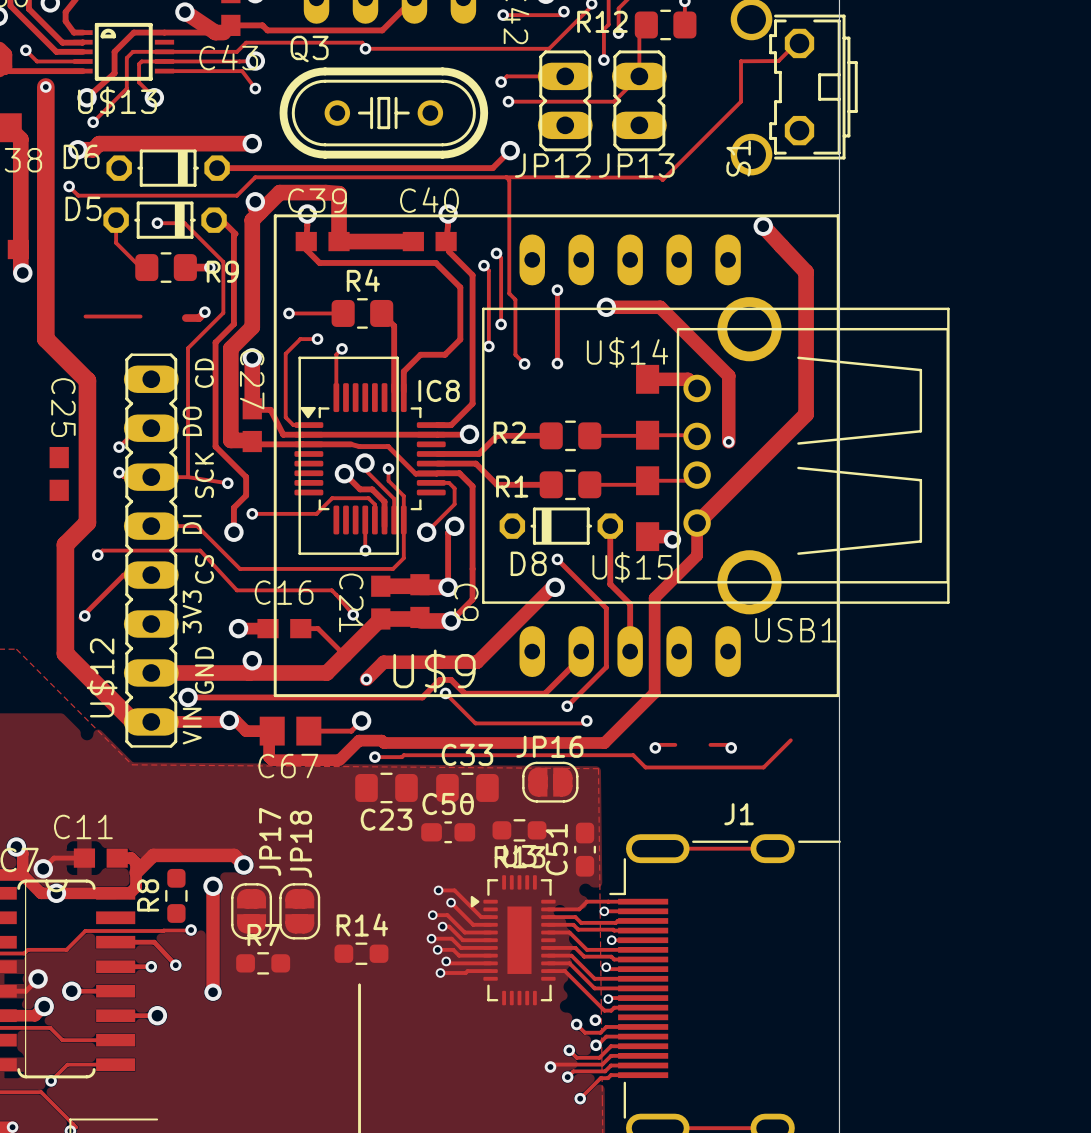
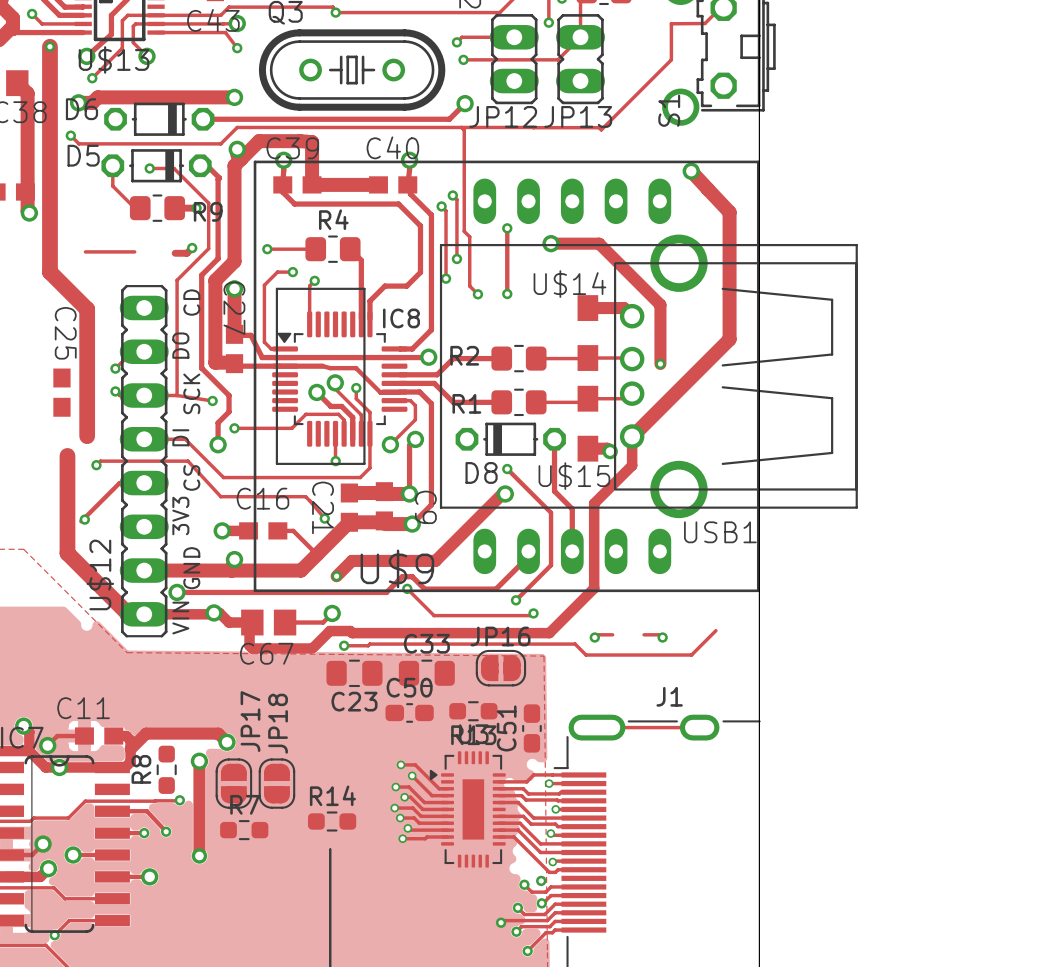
track: (87, 522) (65, 544) -> none

